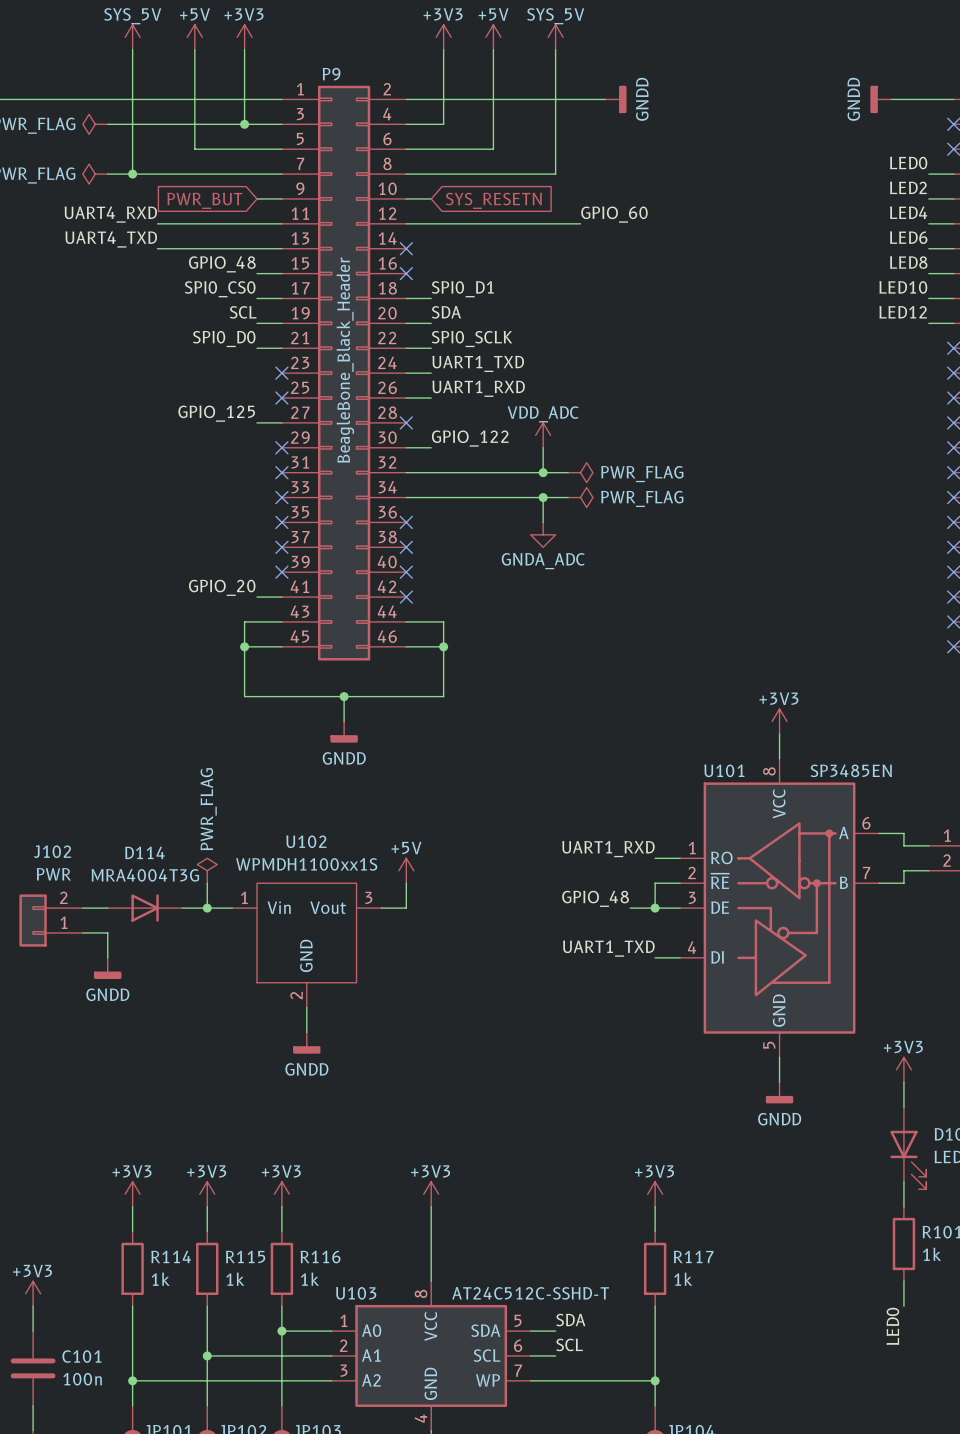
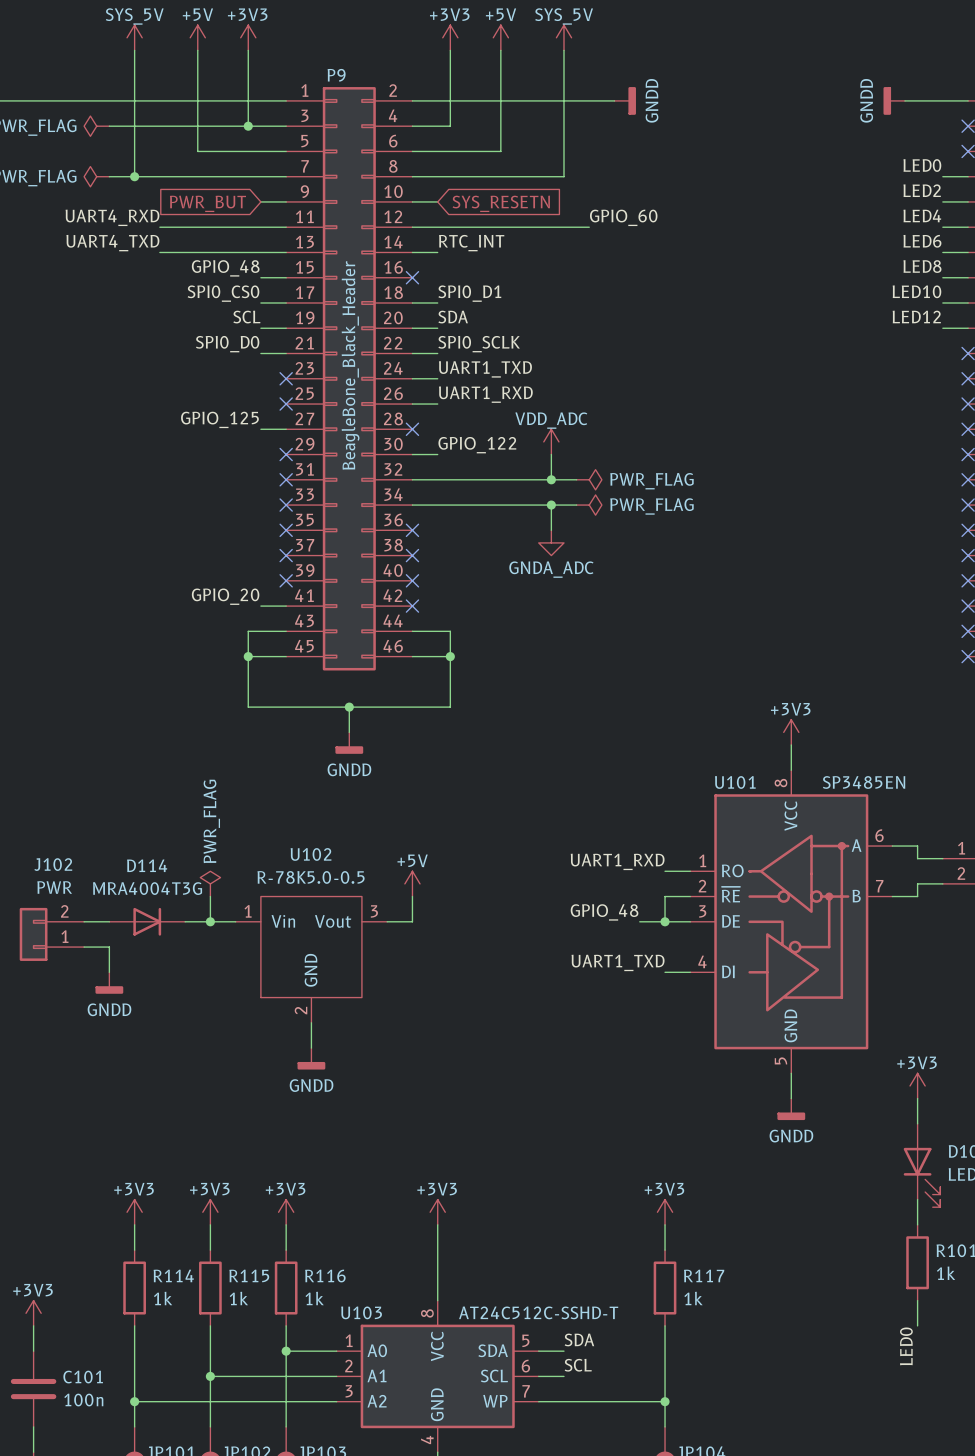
label: none -> RTC_INT (471, 243)
wire: none -> (412, 252) (437, 252)
no-connect mark: (406, 248) -> none
U102 value: WPMDH1100xx1S (306, 864) -> R-78K5.0-0.5 (311, 877)

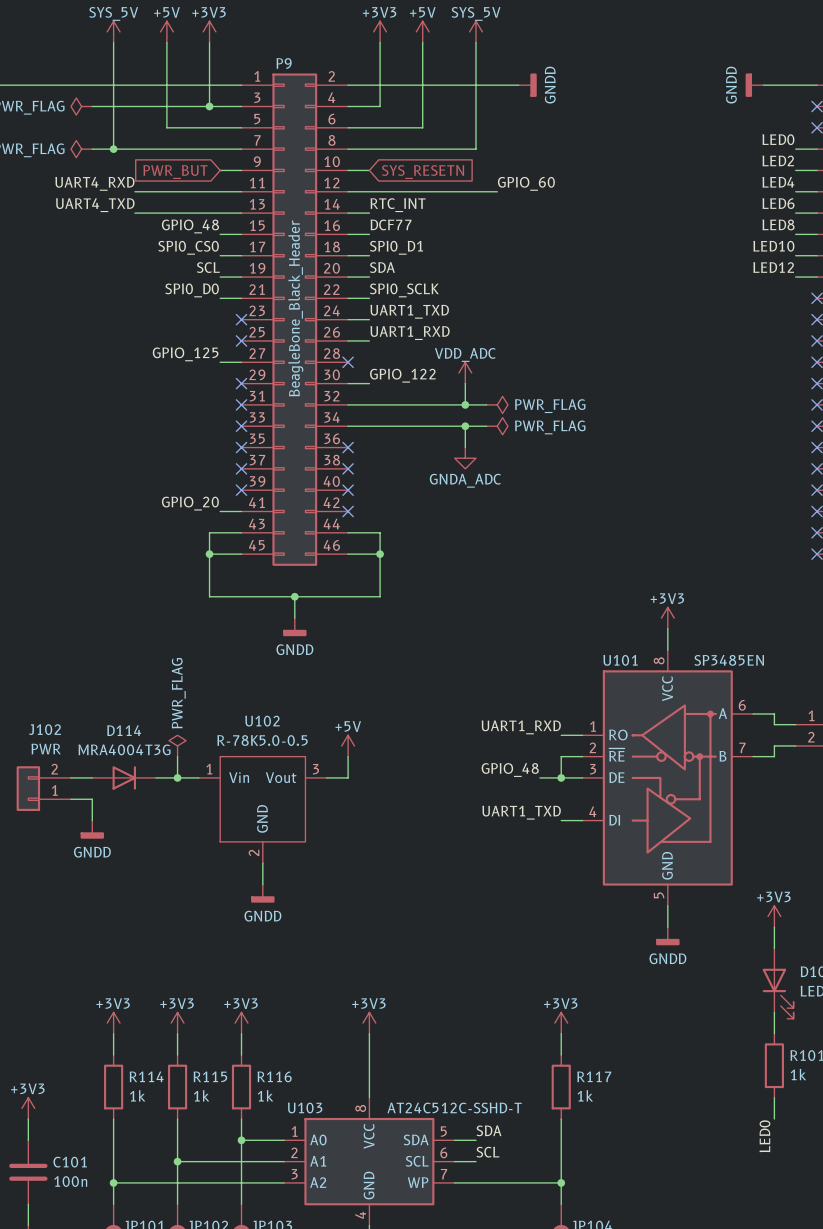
label: none -> DCF77 (391, 224)
wire: none -> (348, 234) (369, 234)
no-connect mark: (412, 277) -> none

